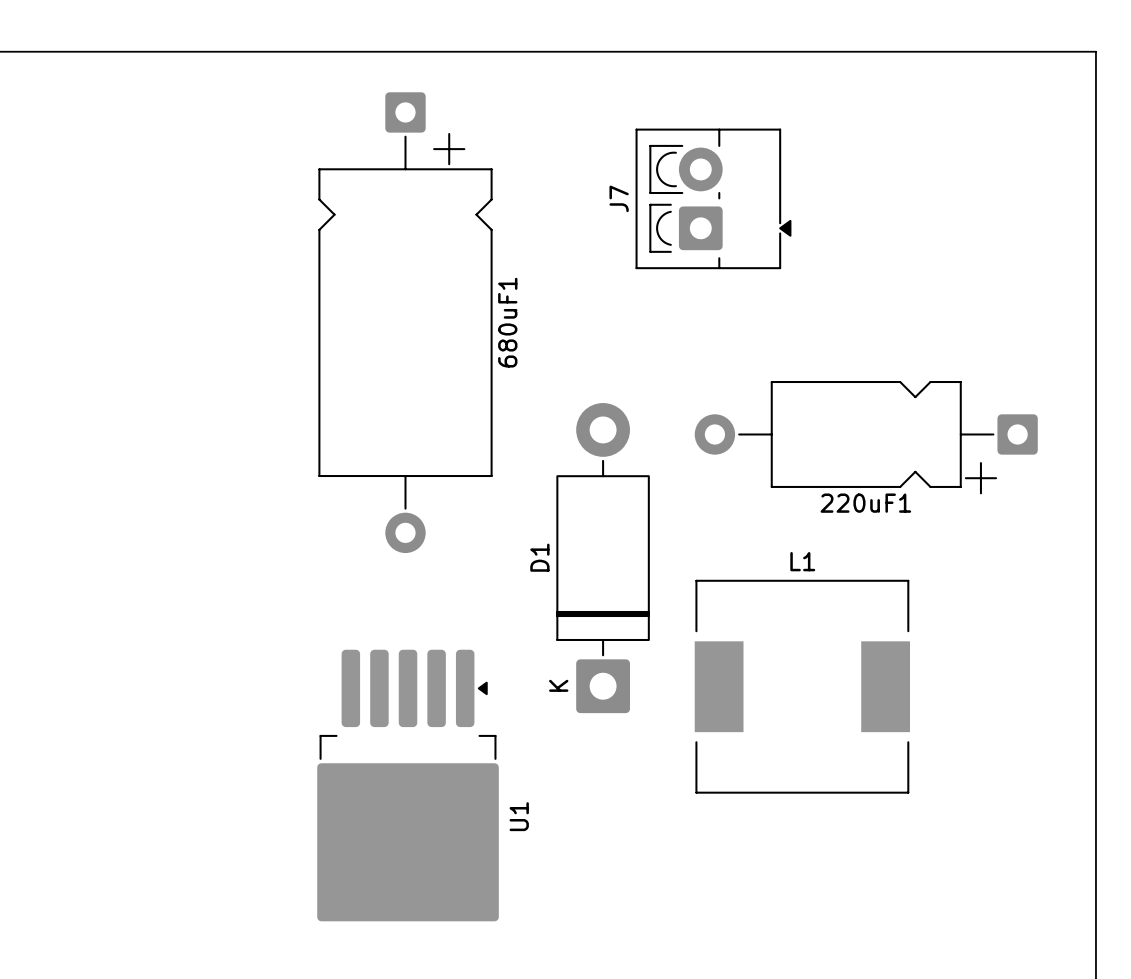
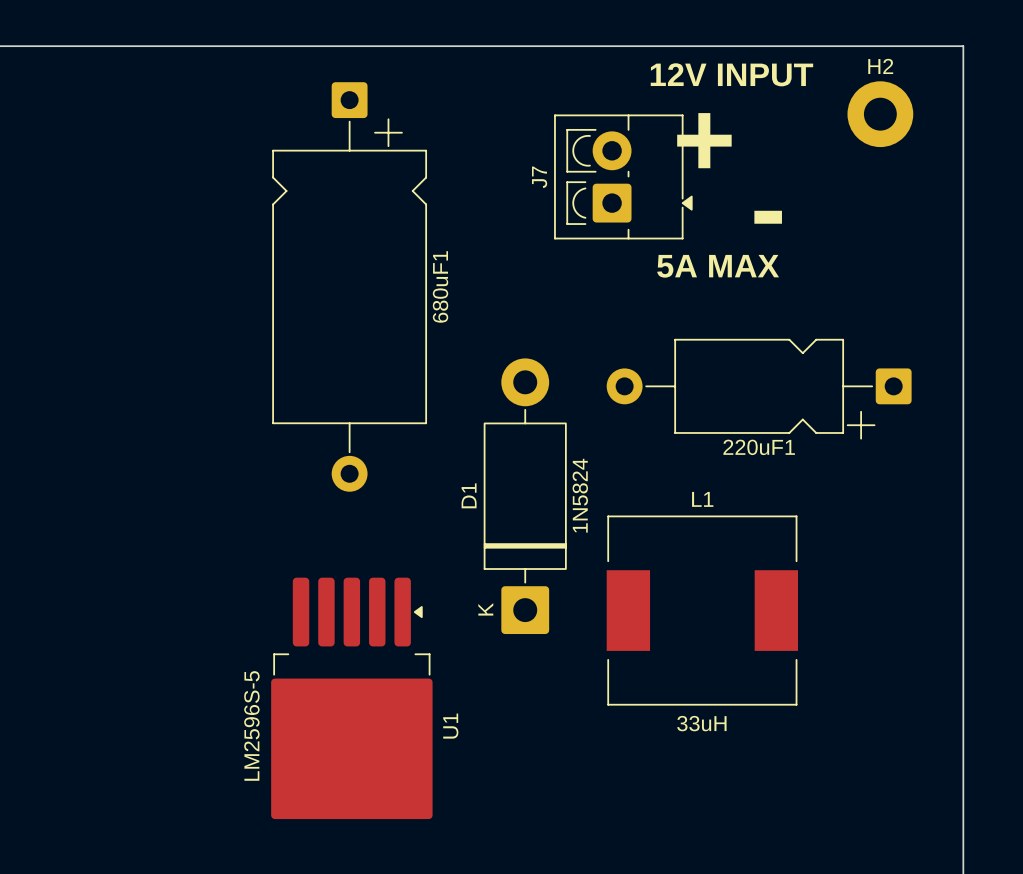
text: none -> 12V INPUT (731, 74)
H2: none -> (880, 114)
text: none -> + (704, 140)
text: none -> - (768, 217)
text: none -> 5A MAX (718, 266)
D1 value: none -> 1N5824 (580, 495)
L1 value: none -> 33uH (701, 723)
U1 value: none -> LM2596S-5 (251, 725)

